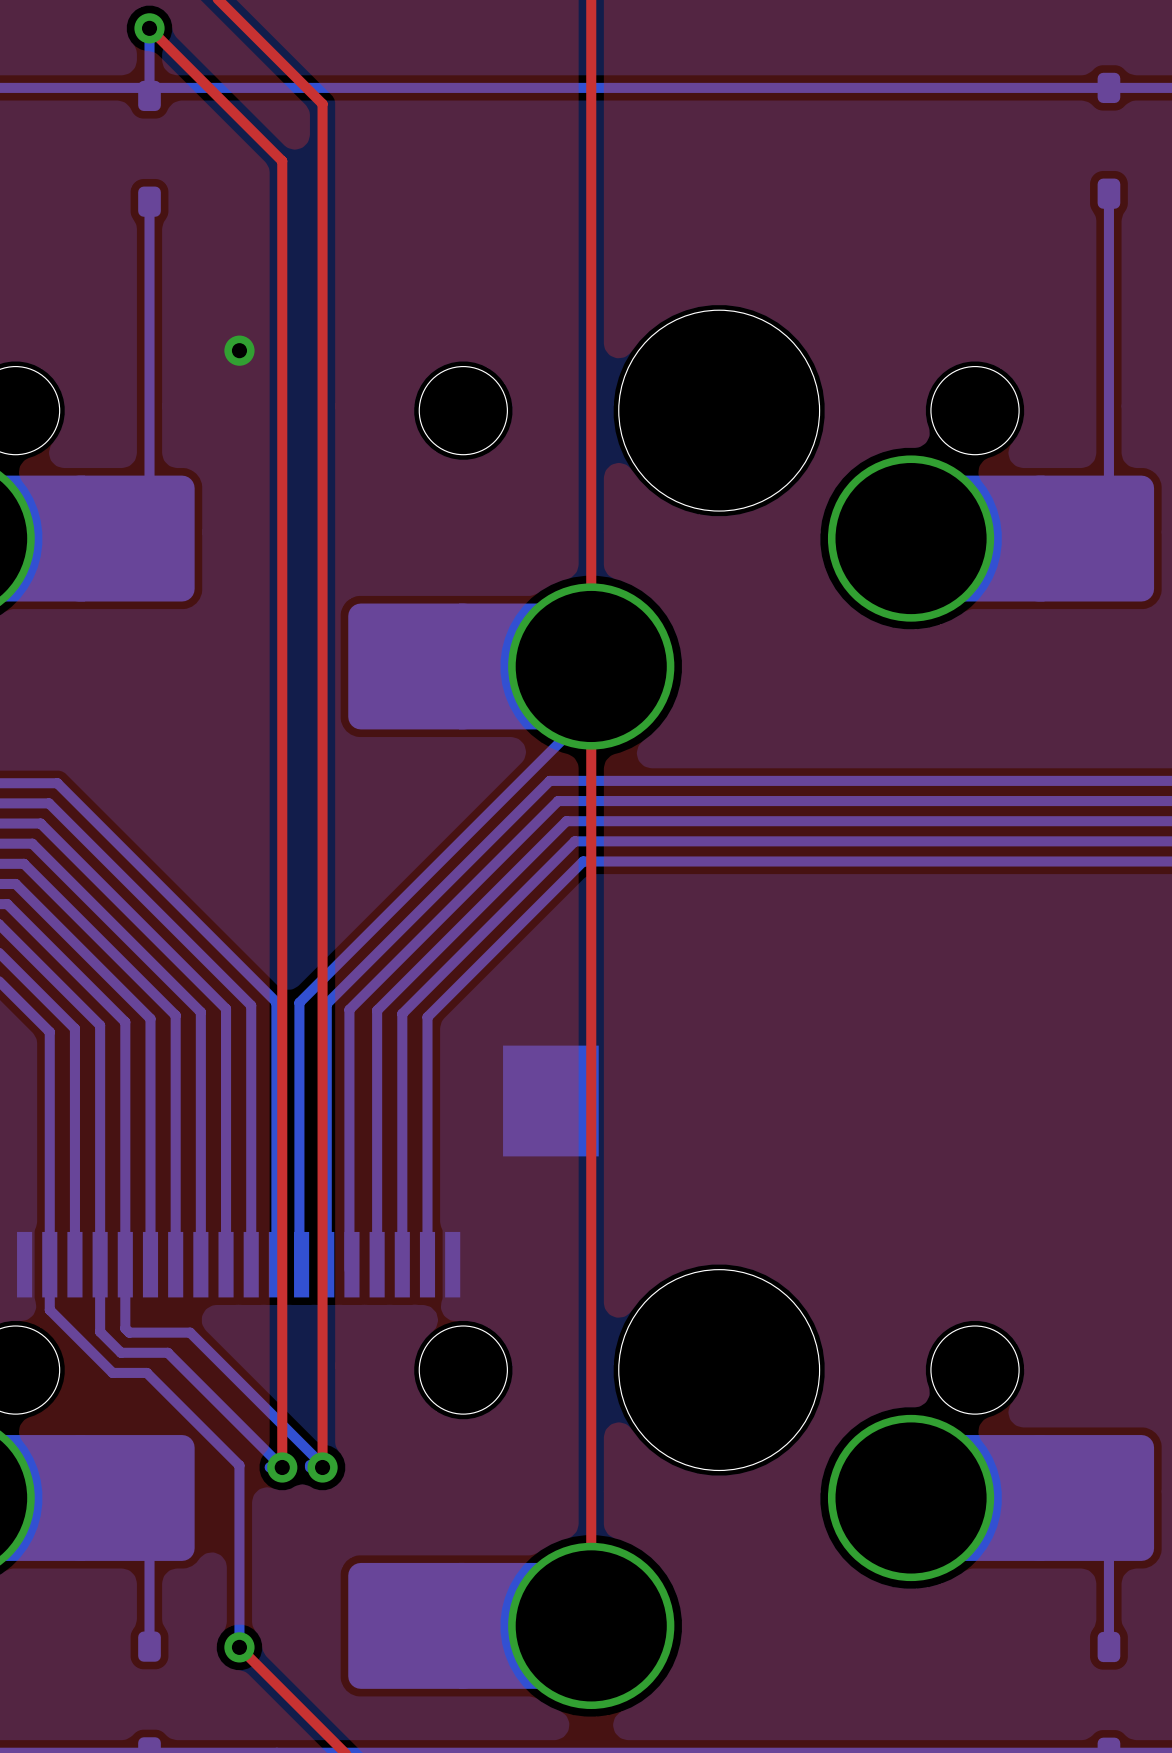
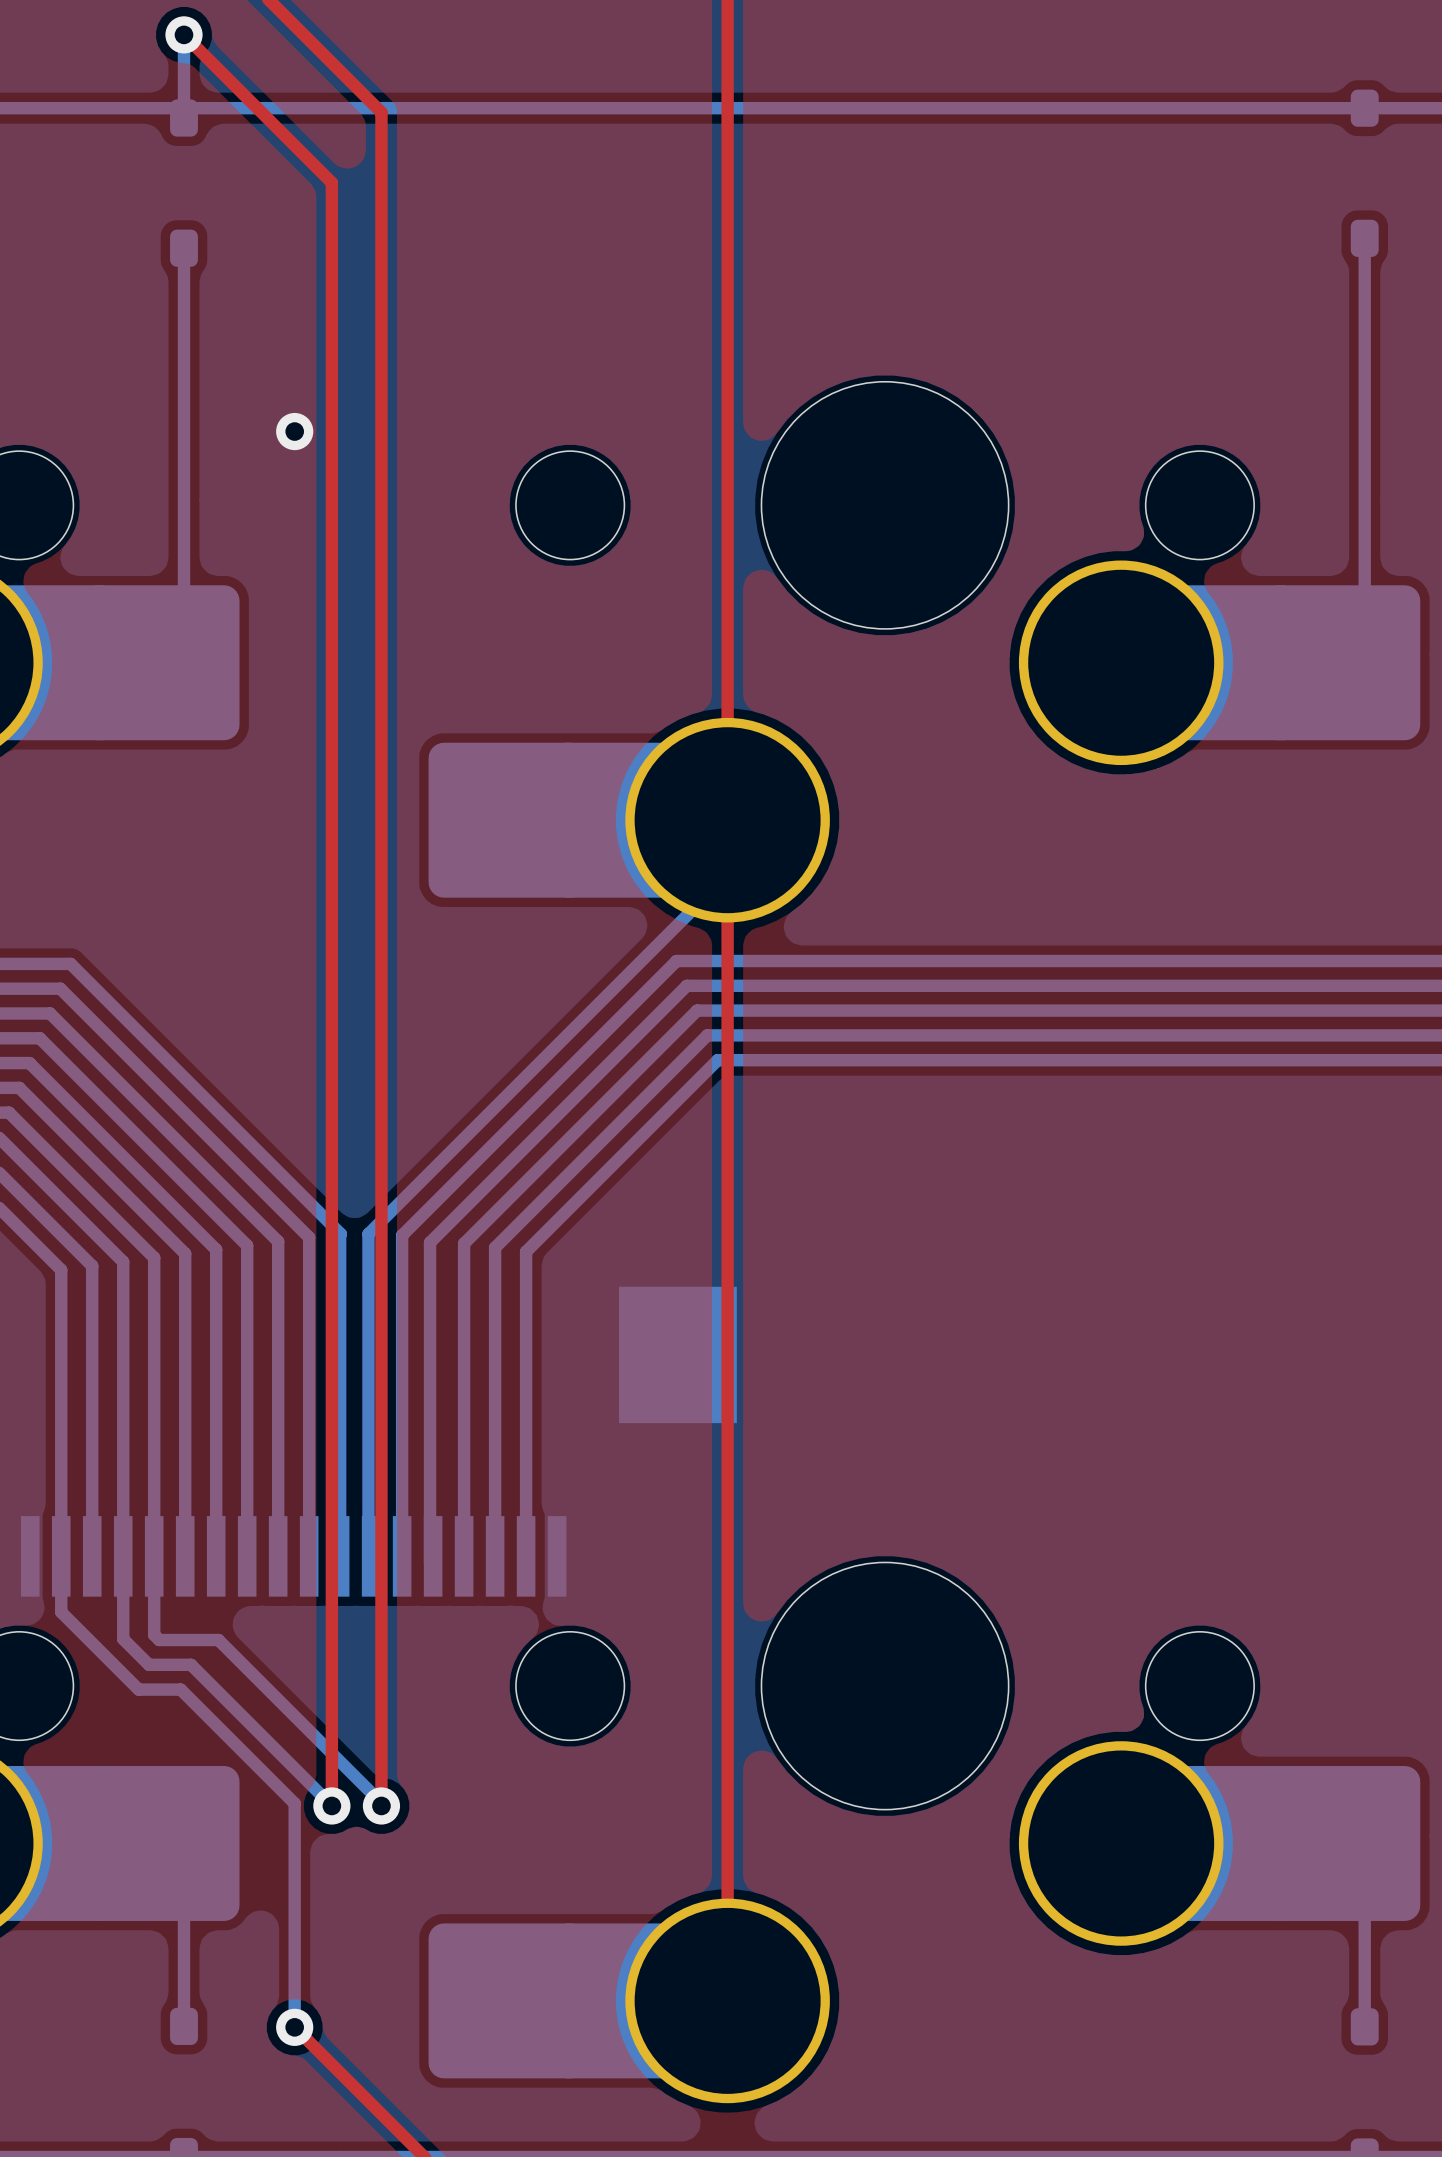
top track: (309, 91) (322, 103) (322, 1467) -> (381, 112) (381, 1805)
top track: (269, 148) (282, 161) (282, 1467) -> (331, 182) (331, 1805)
bottom track: (177, 1332) (190, 1332) (322, 1465) -> (218, 1640) (381, 1802)
bottom track: (155, 1352) (167, 1352) (282, 1467) -> (191, 1664) (331, 1805)
via position: (282, 1467) -> (331, 1805)
via position: (322, 1467) -> (381, 1805)

